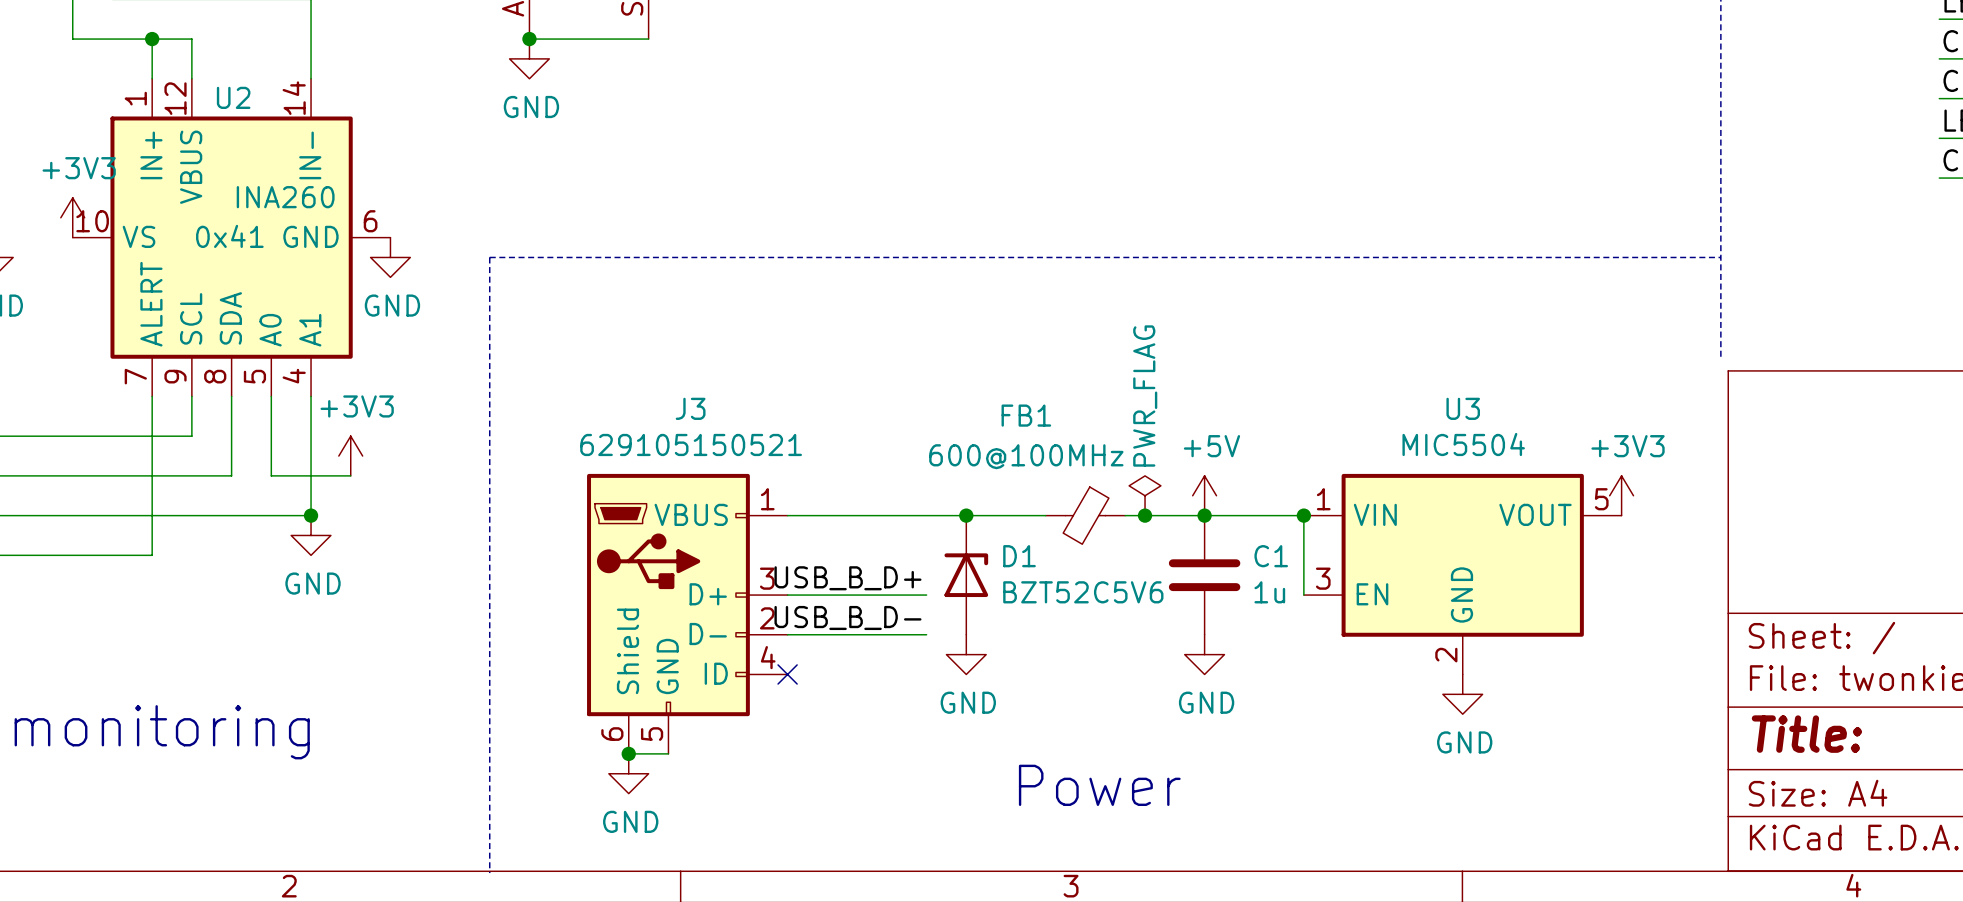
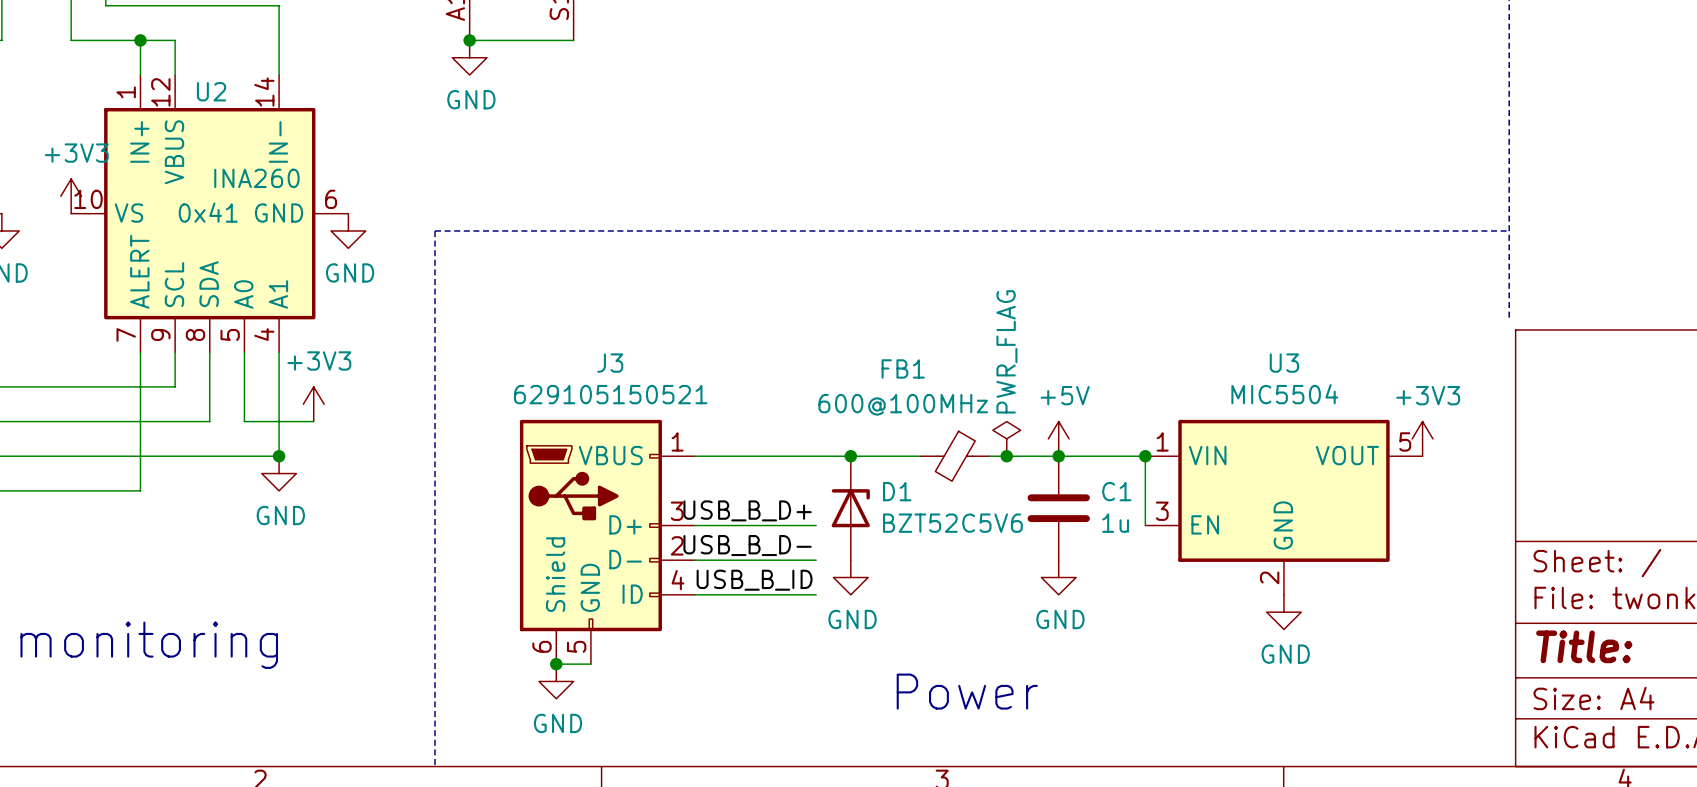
label: none -> USB_B_ID (754, 580)
wire: none -> (694, 594) (816, 594)
no-connect mark: (787, 674) -> none

